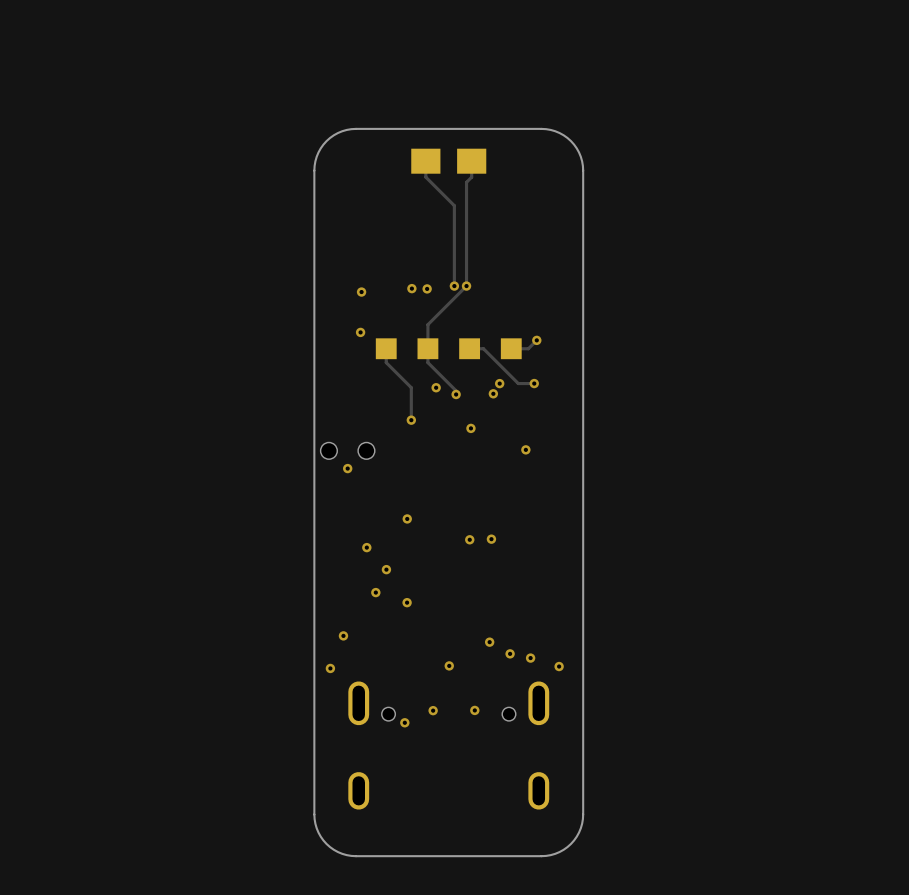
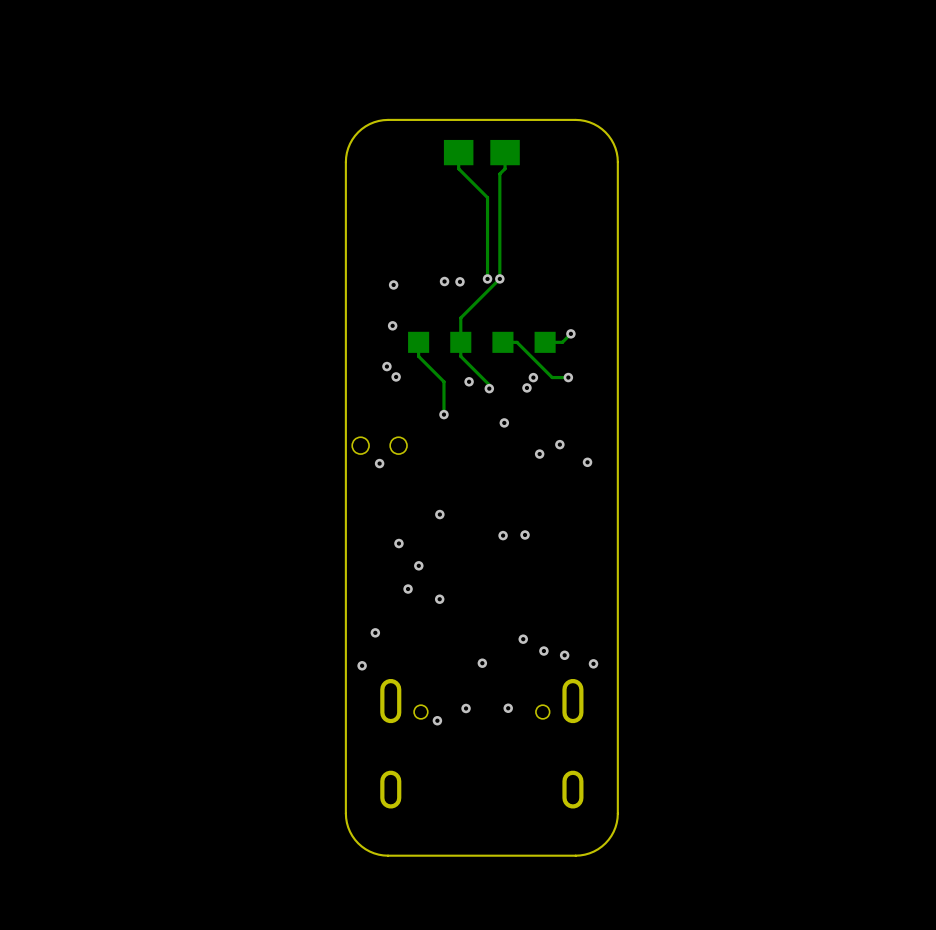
via: none -> (386, 366)
via: none -> (396, 376)
via: none -> (539, 454)
via: none -> (587, 462)

